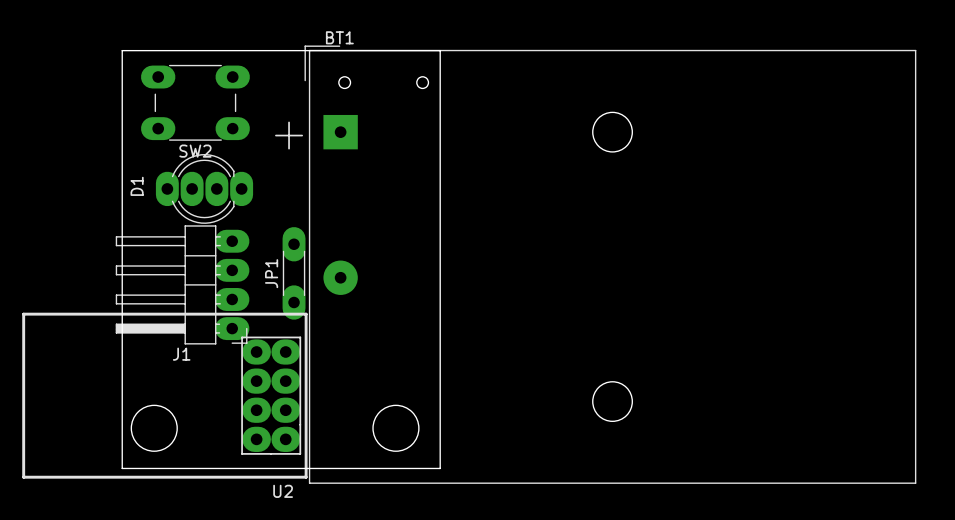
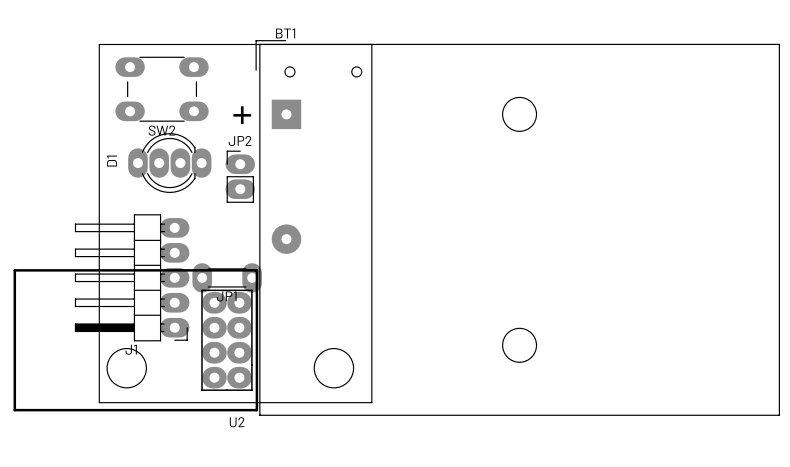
JP2: none -> (240, 176)
J1 footprint: [115, 225, 250, 345] -> [74, 214, 190, 342]
JP1 footprint: [282, 227, 306, 320] -> [192, 263, 262, 293]
JP1 name position: JP1 (271, 273) -> JP1 (226, 296)

